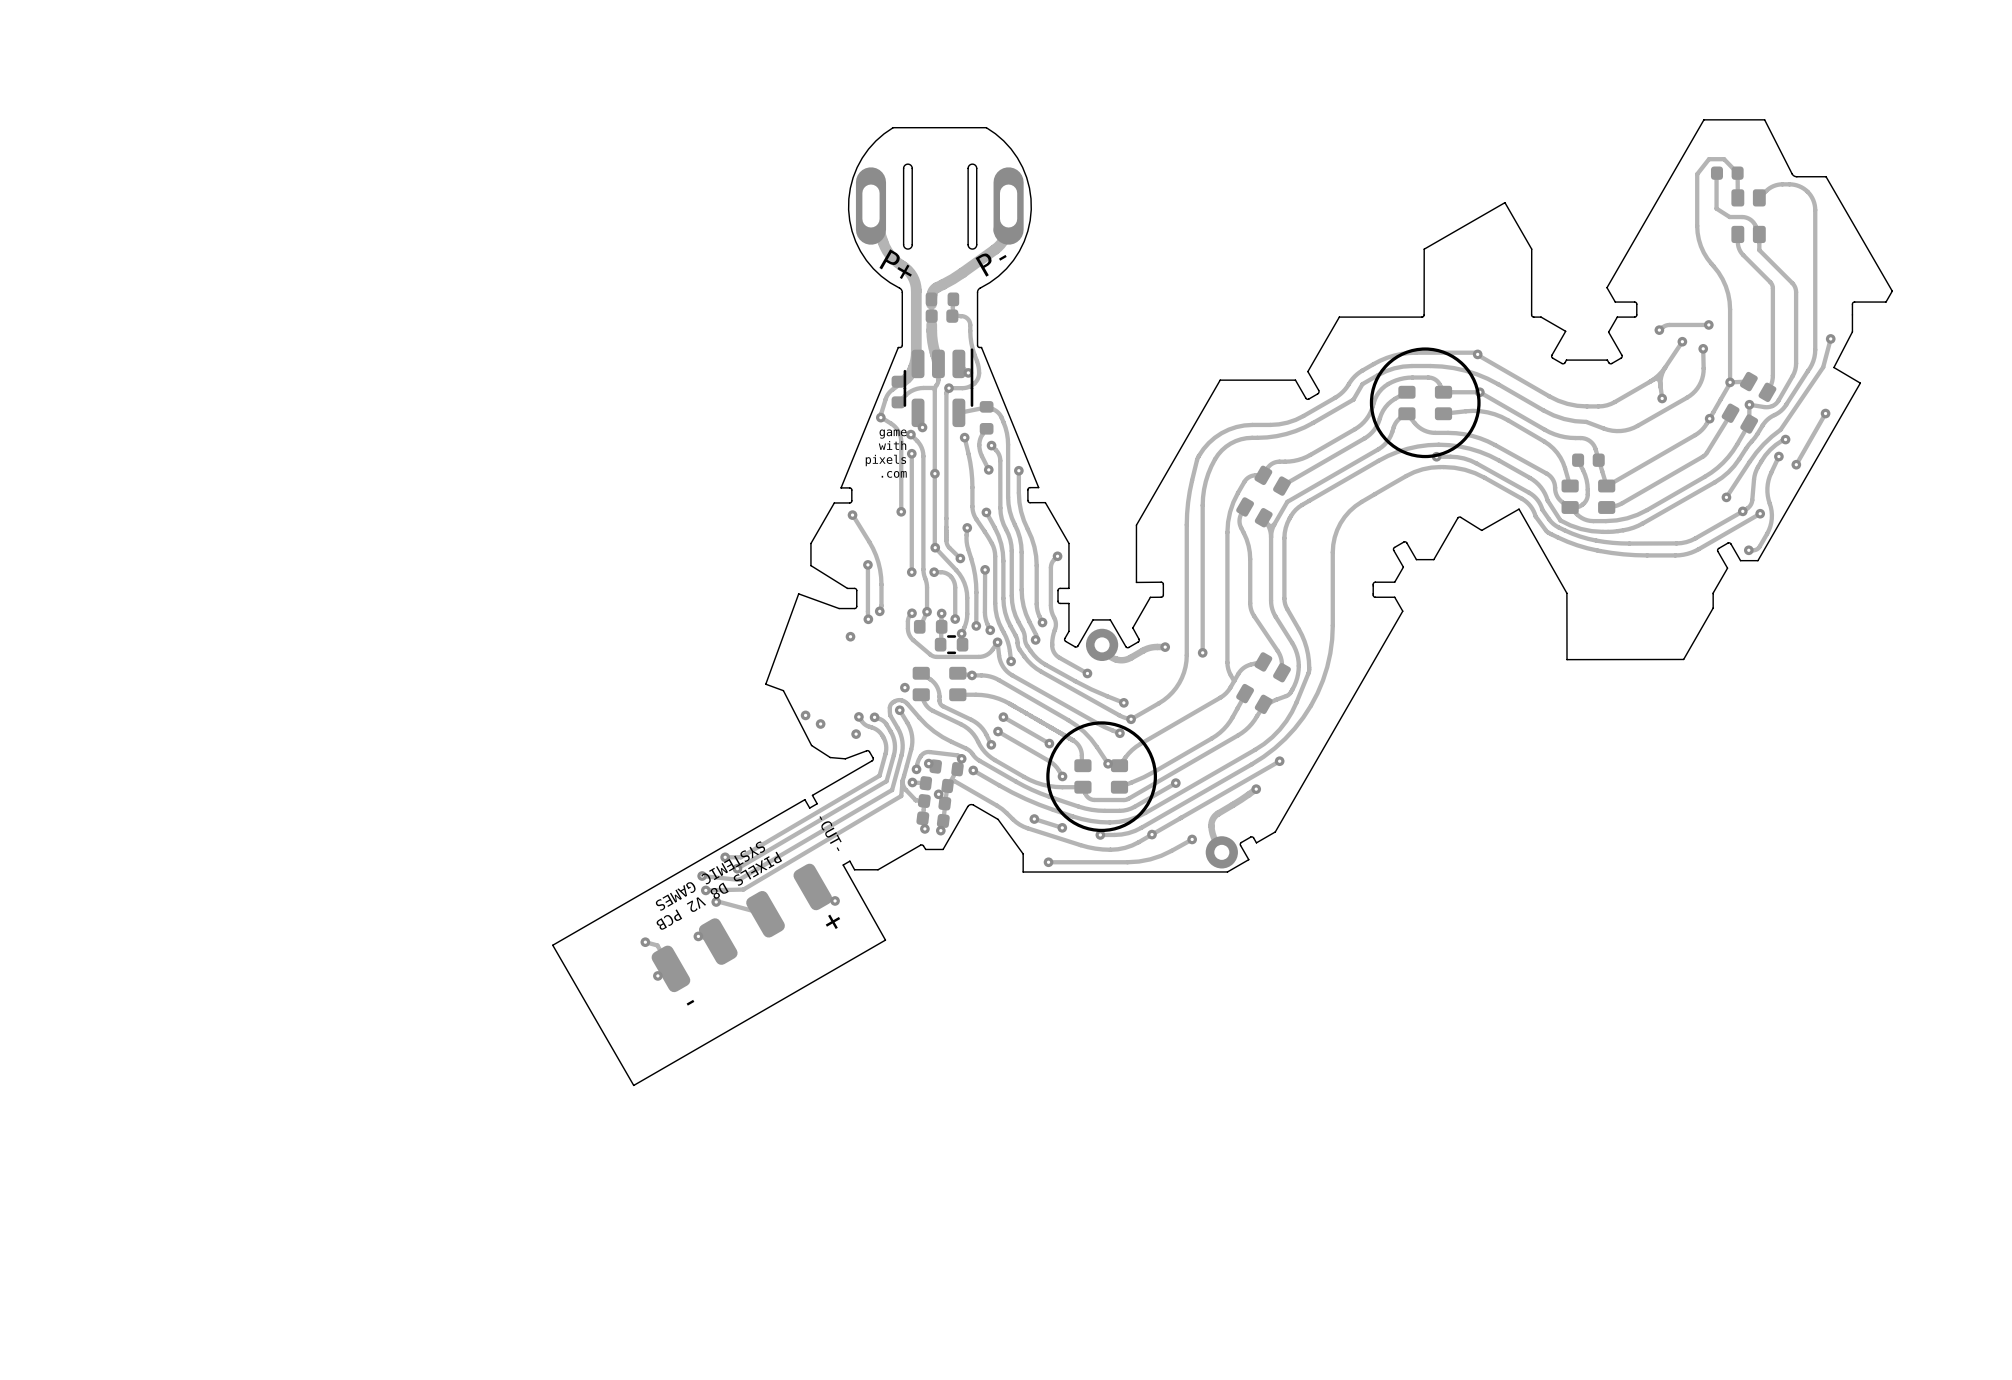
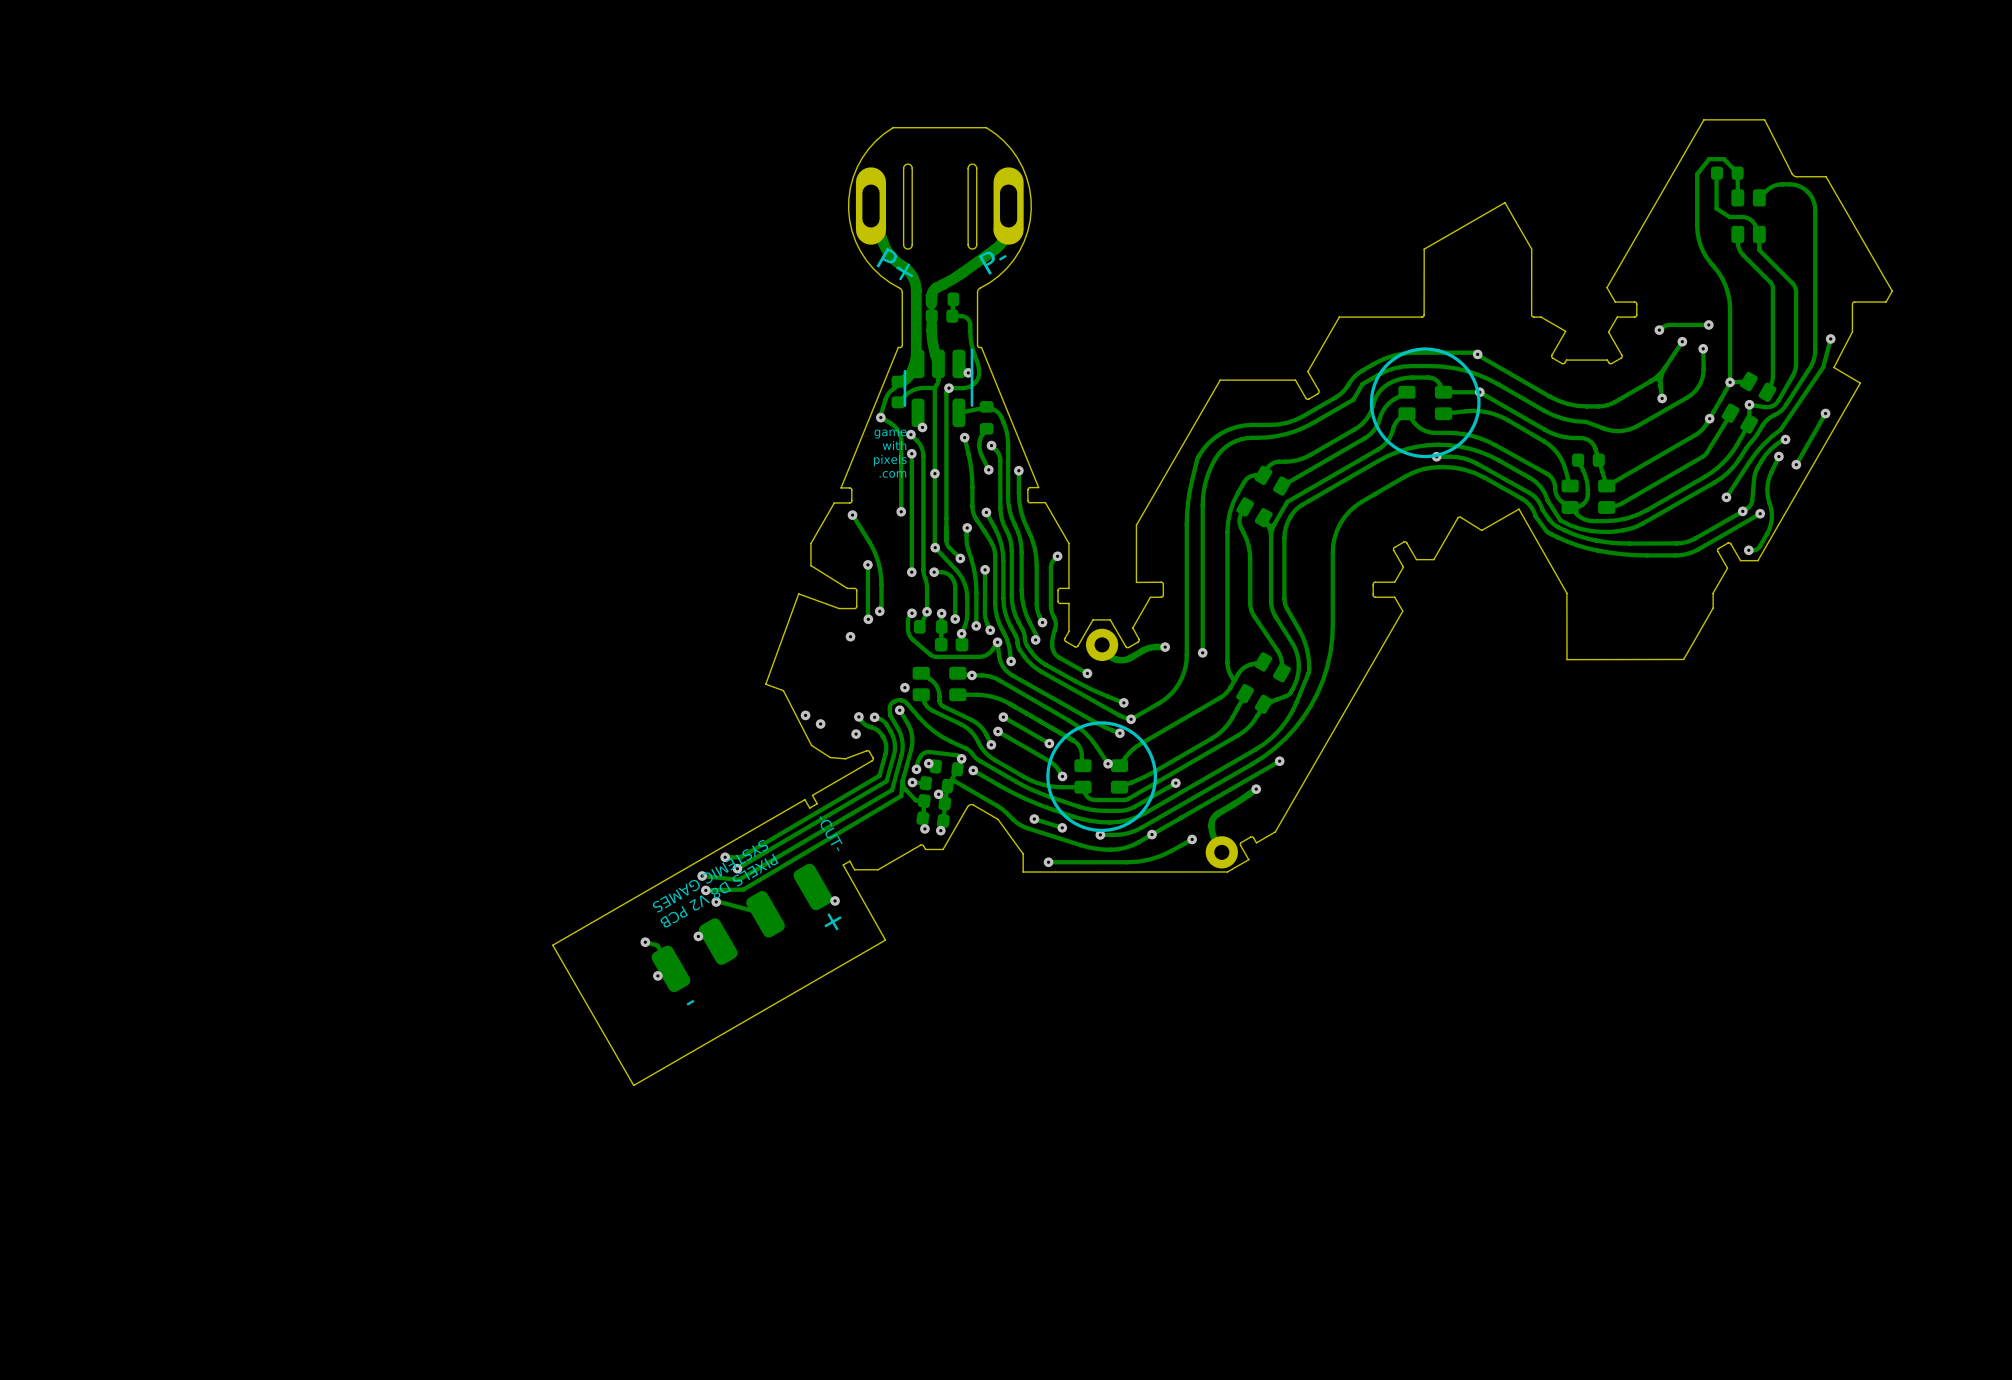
part footprint: [934, 635, 969, 655] -> [934, 637, 969, 652]

